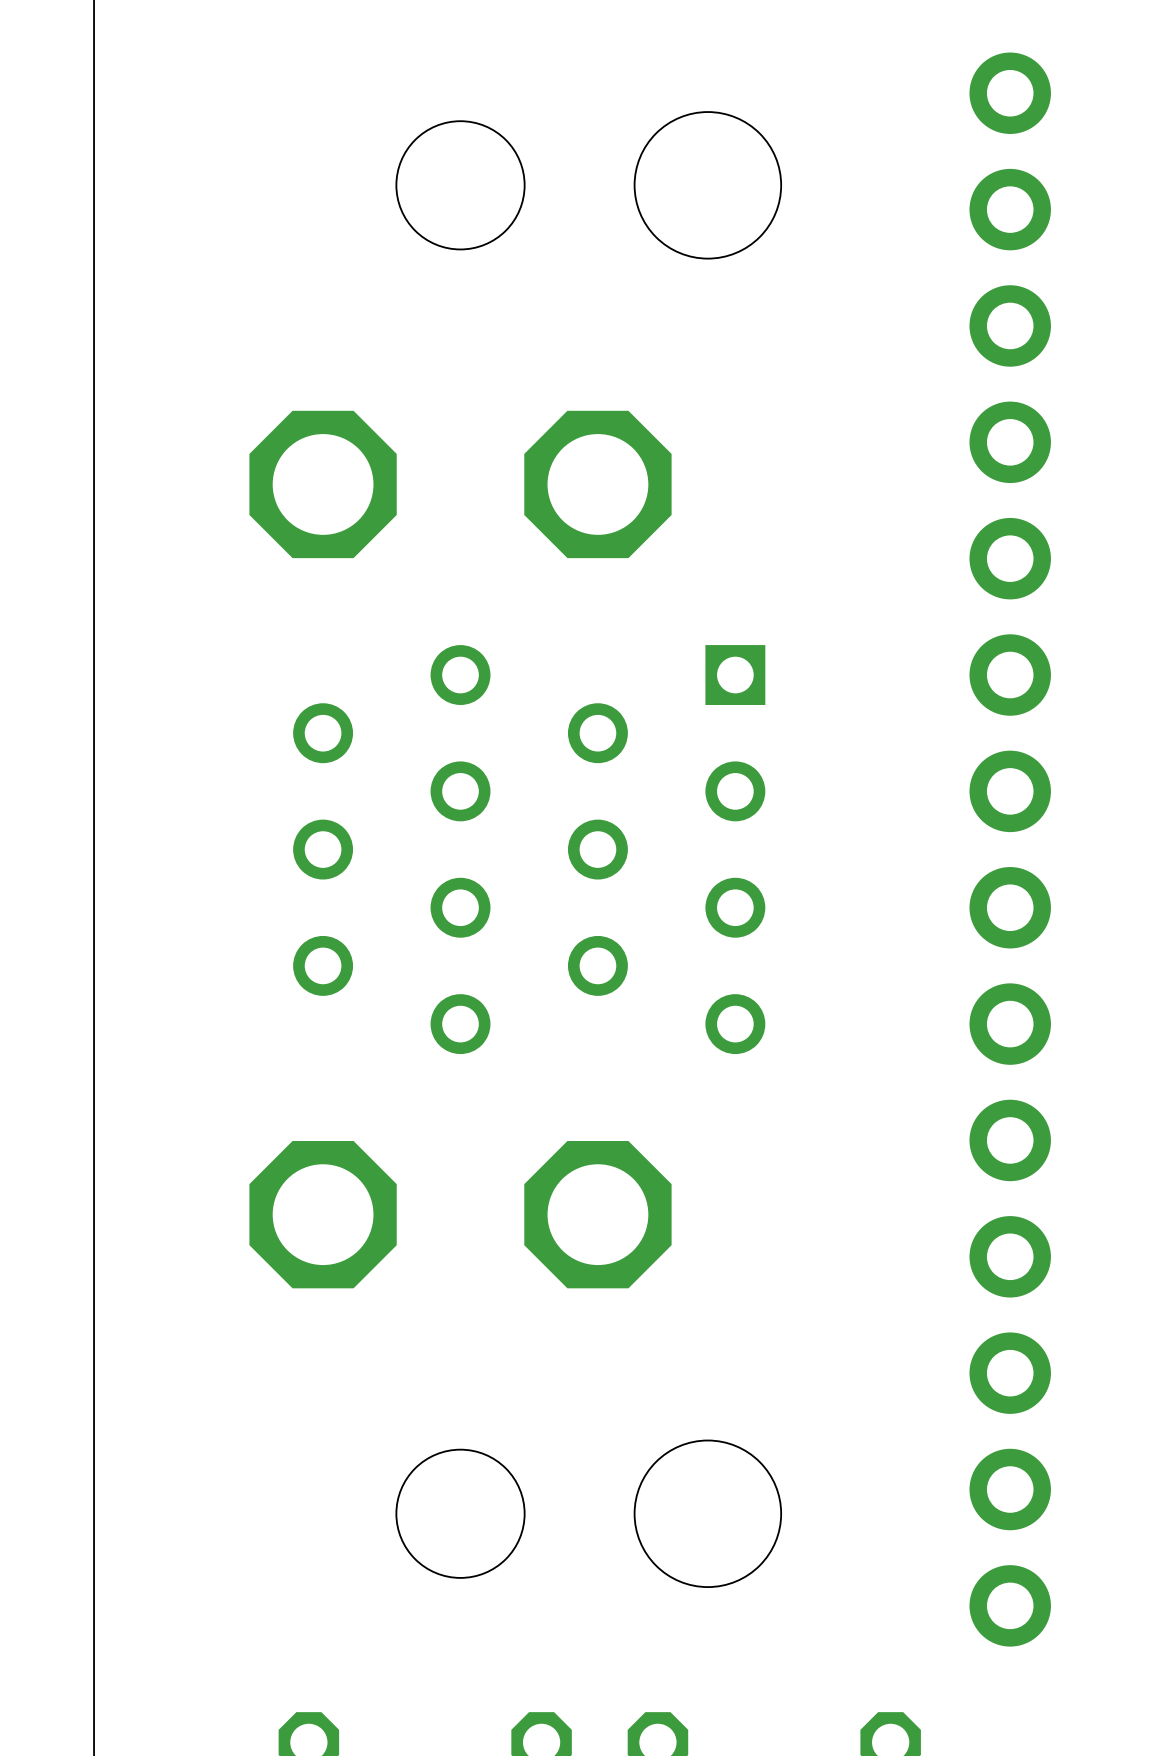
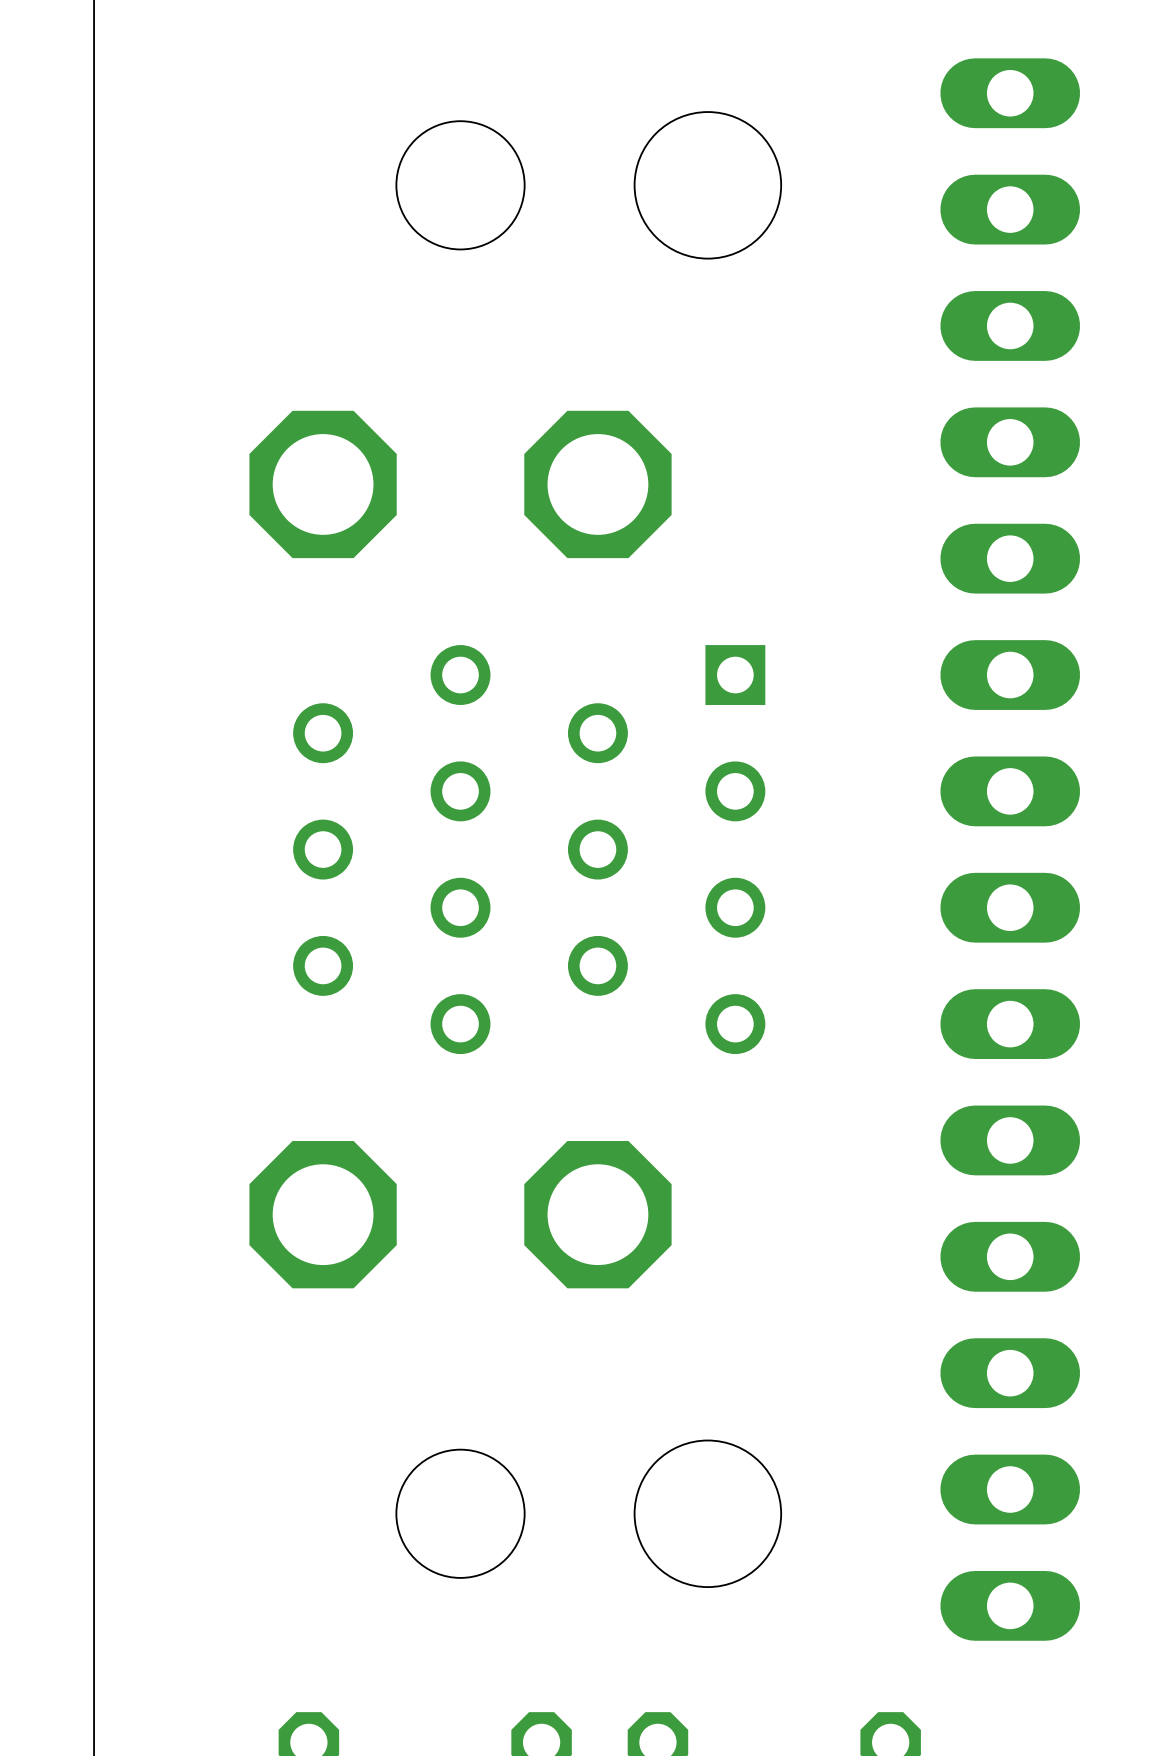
part footprint: [969, 52, 1051, 1647] -> [940, 58, 1081, 1641]

